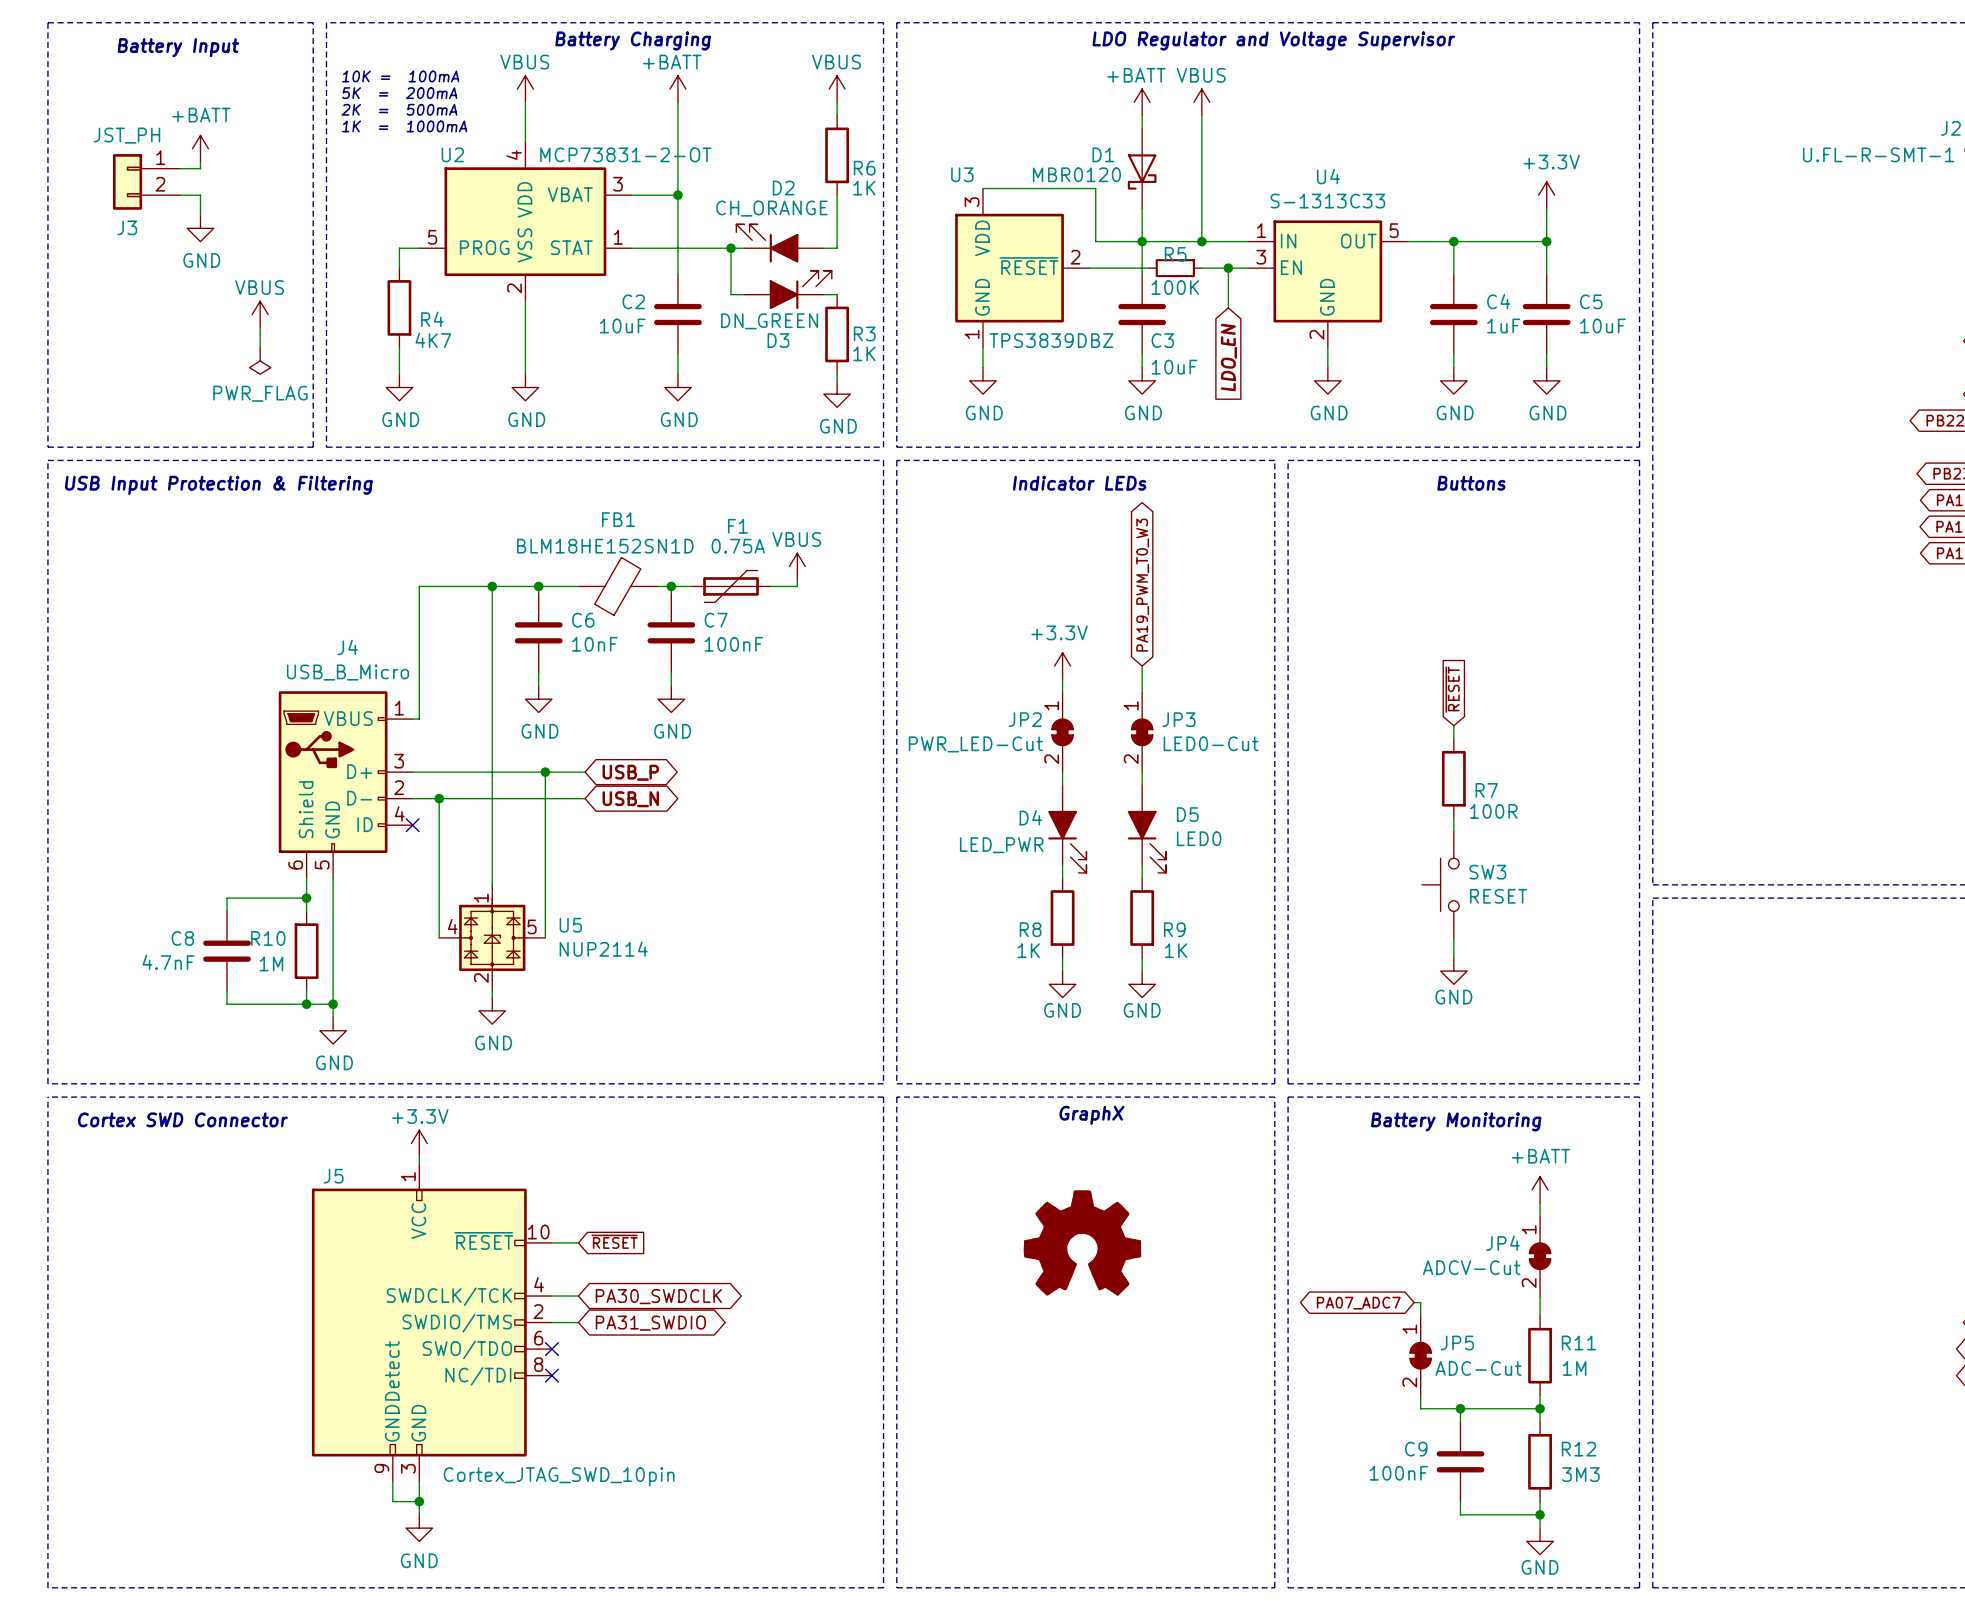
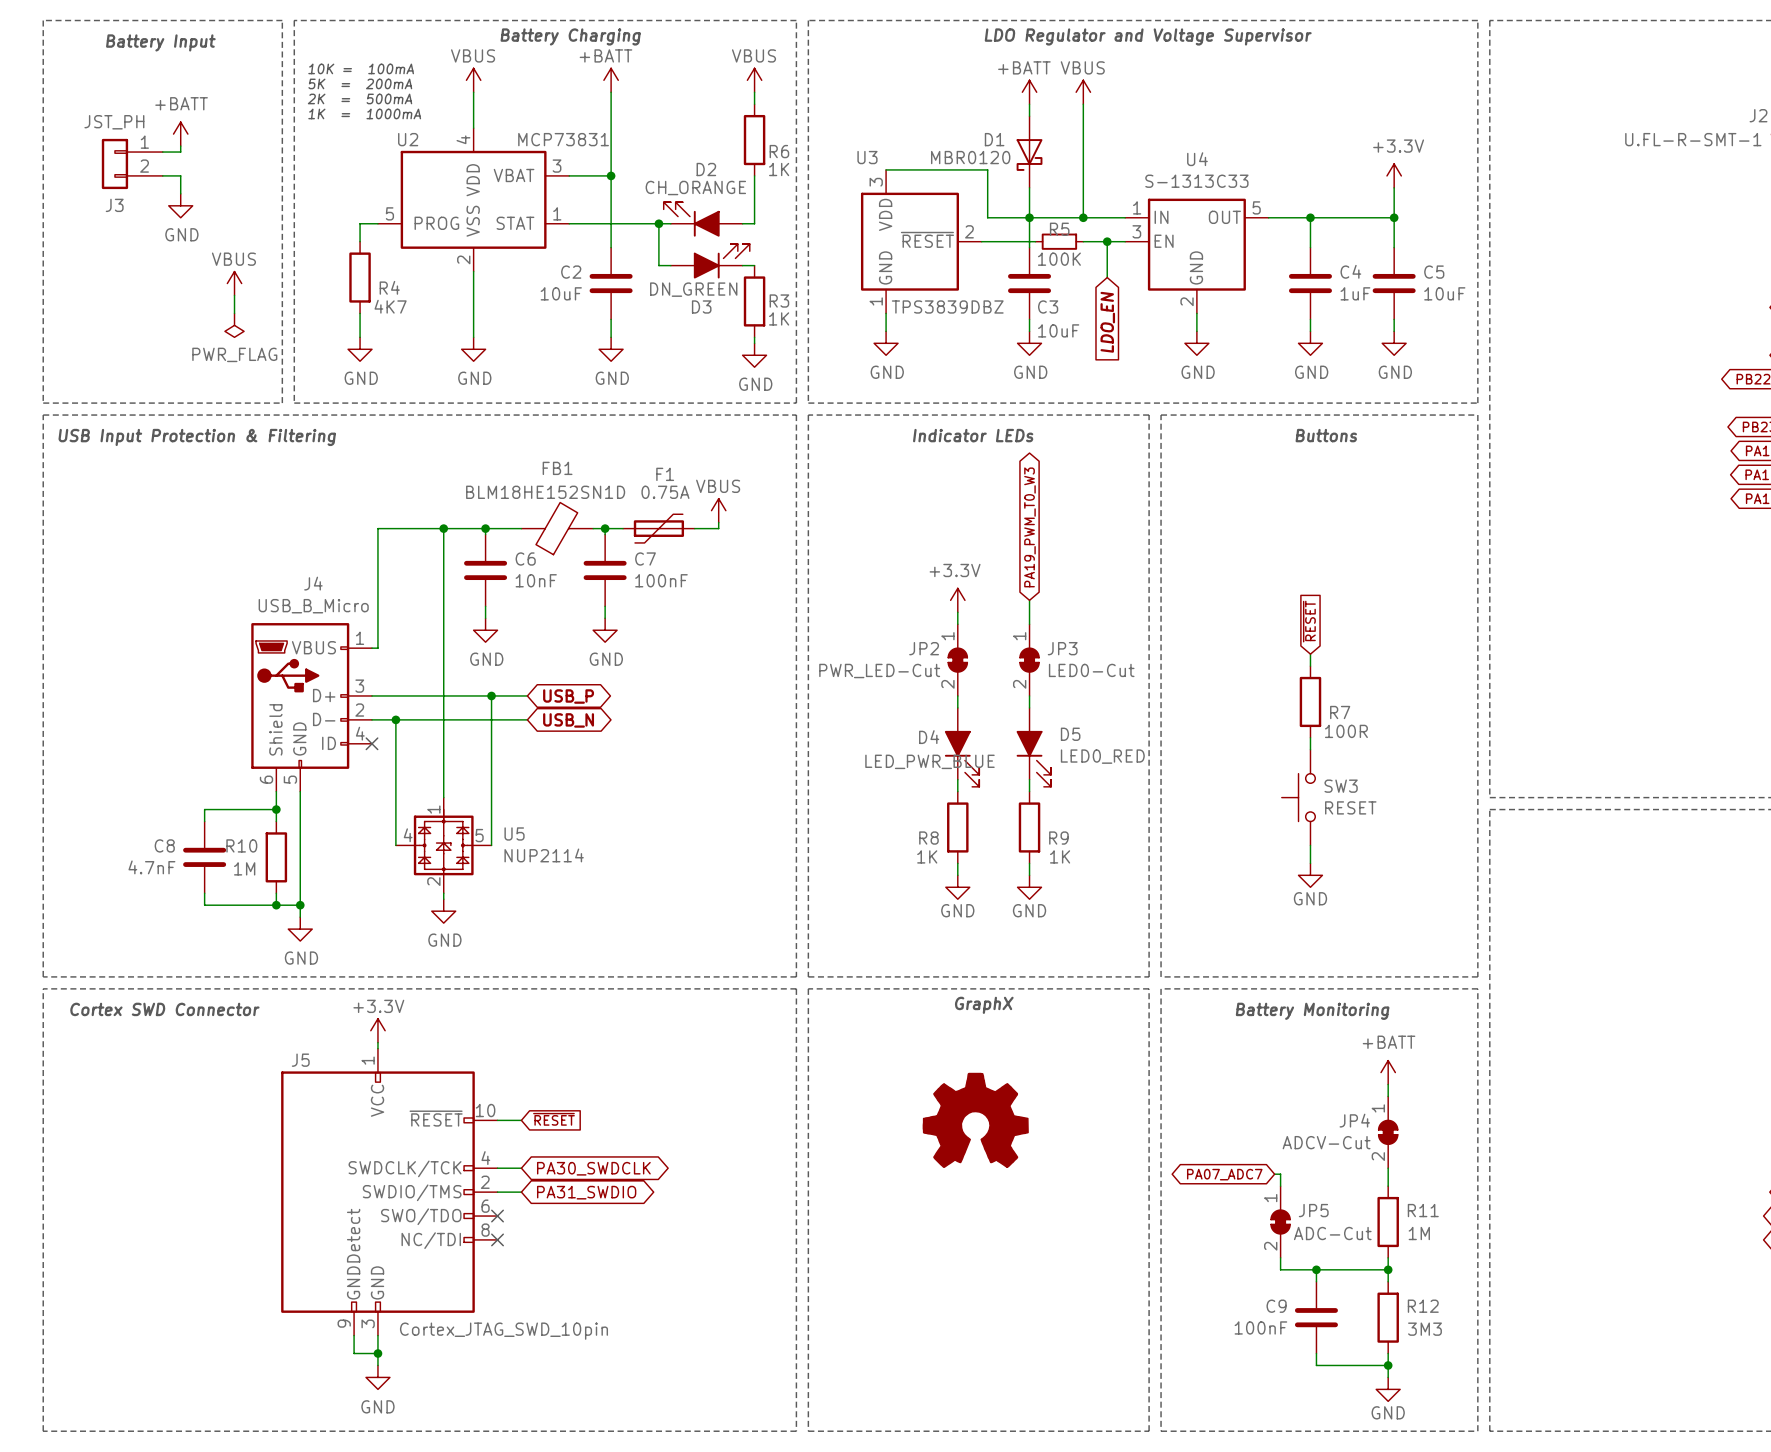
U2 value: MCP73831-2-OT (625, 154) -> MCP73831 (563, 139)
D5 value: LED0 (1199, 838) -> LED0_RED (1102, 756)
D4 value: LED_PWR (1001, 845) -> LED_PWR_BLUE (929, 761)

